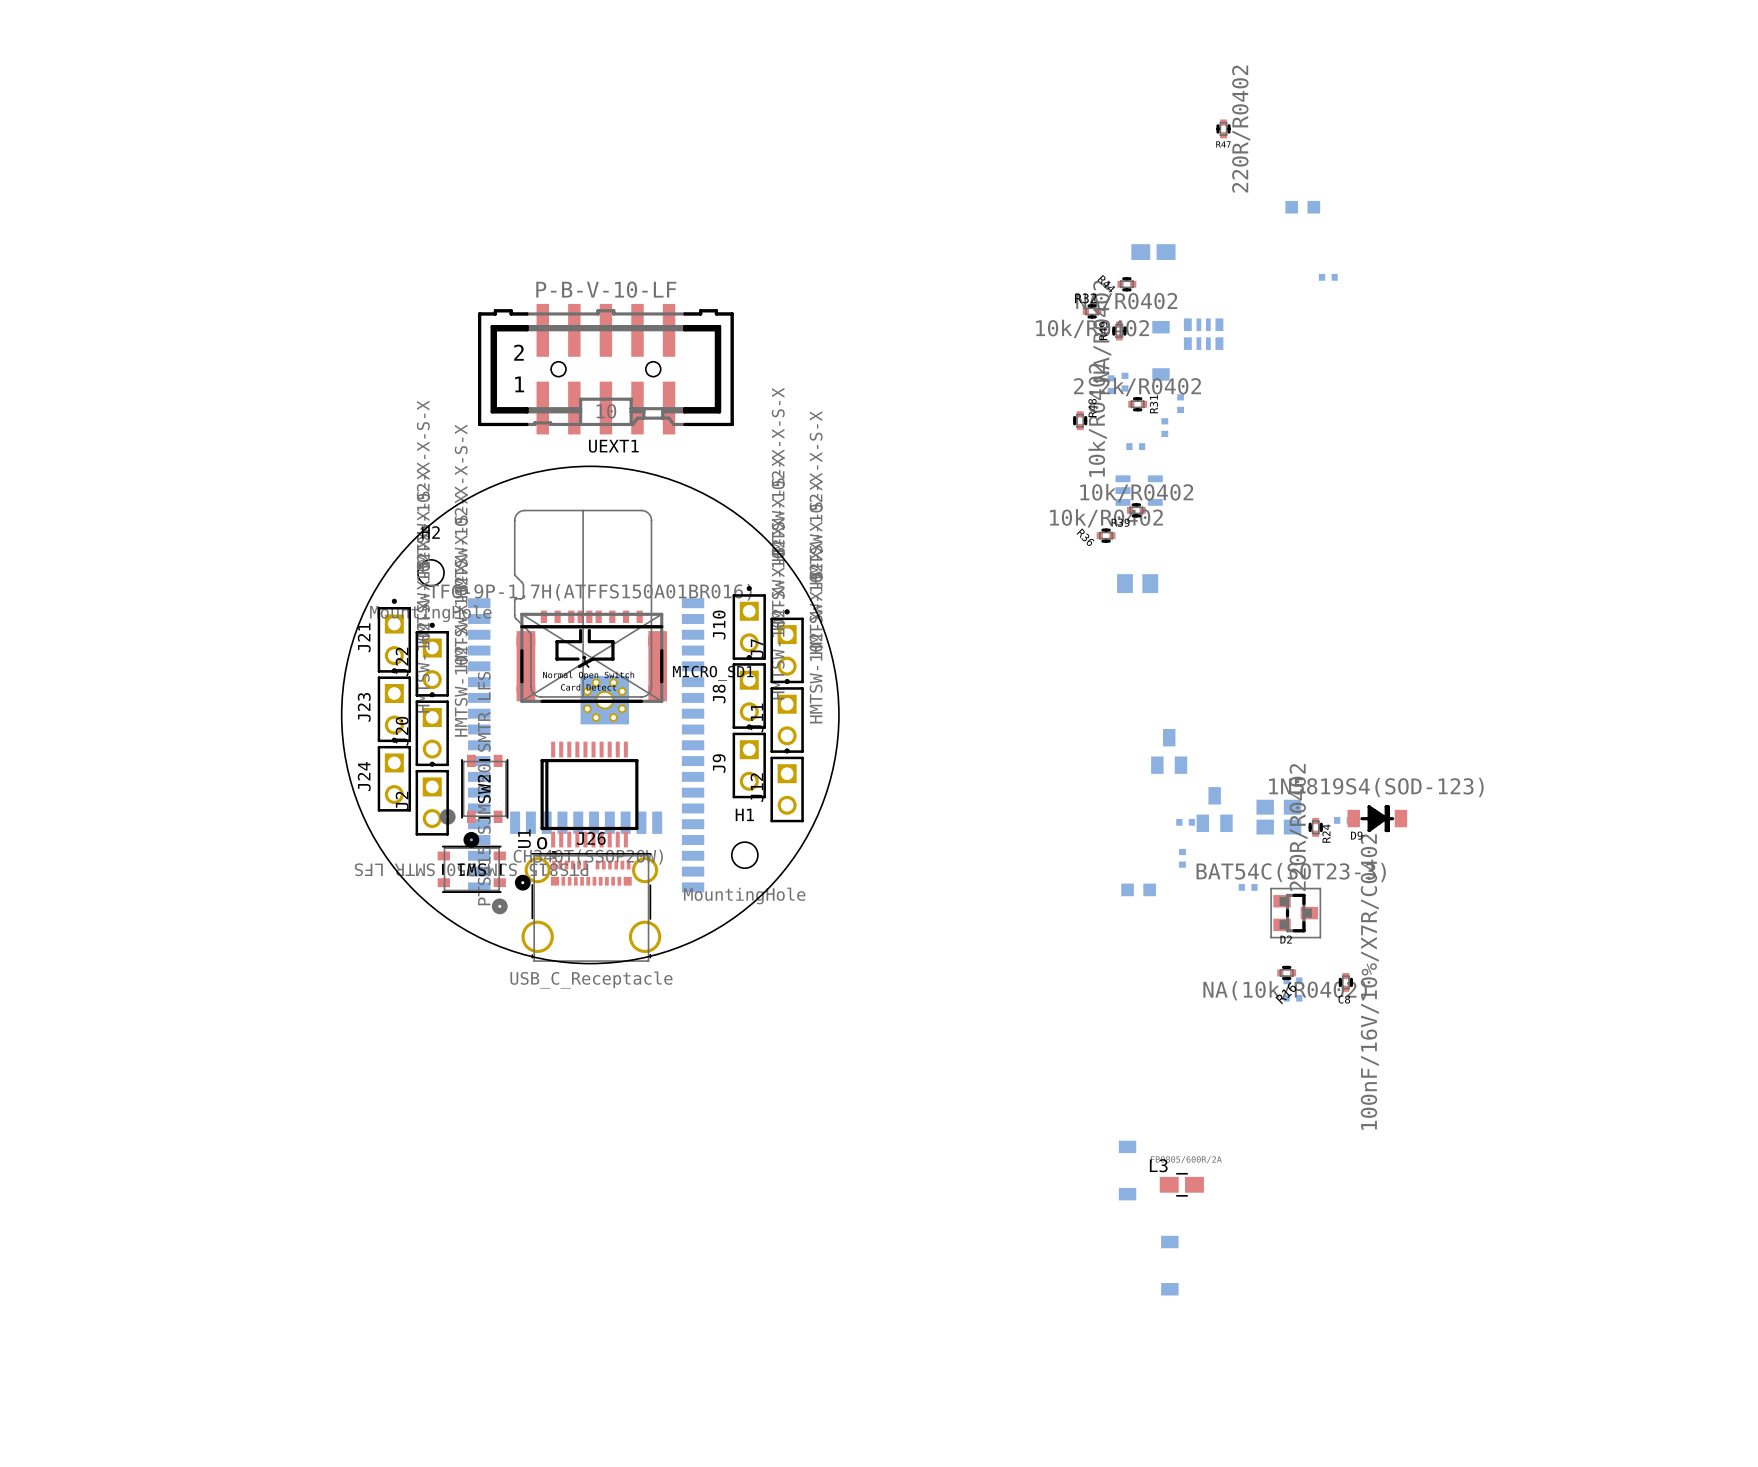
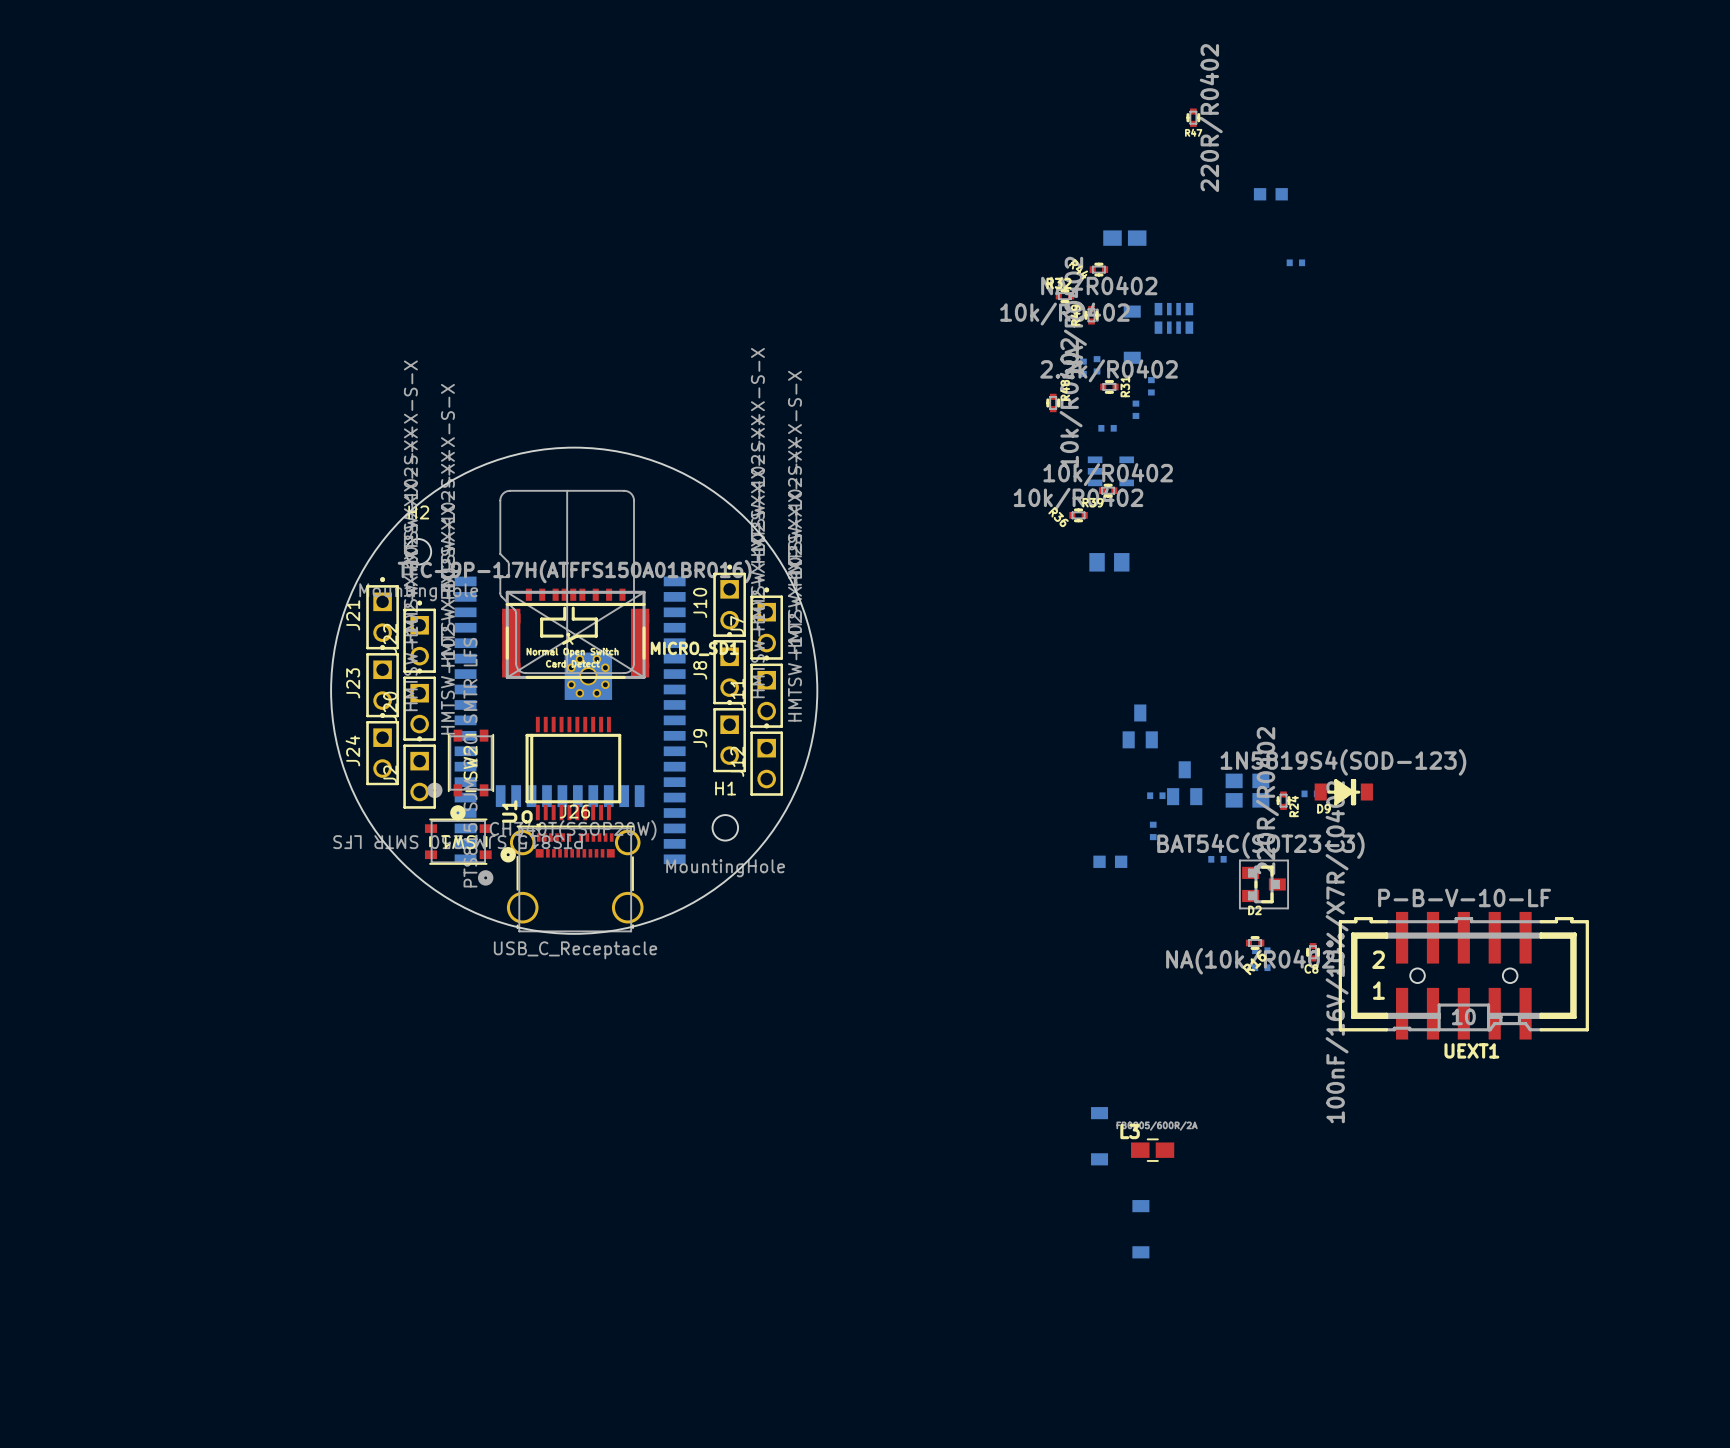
UEXT1 position: (605, 369) -> (1463, 975)

